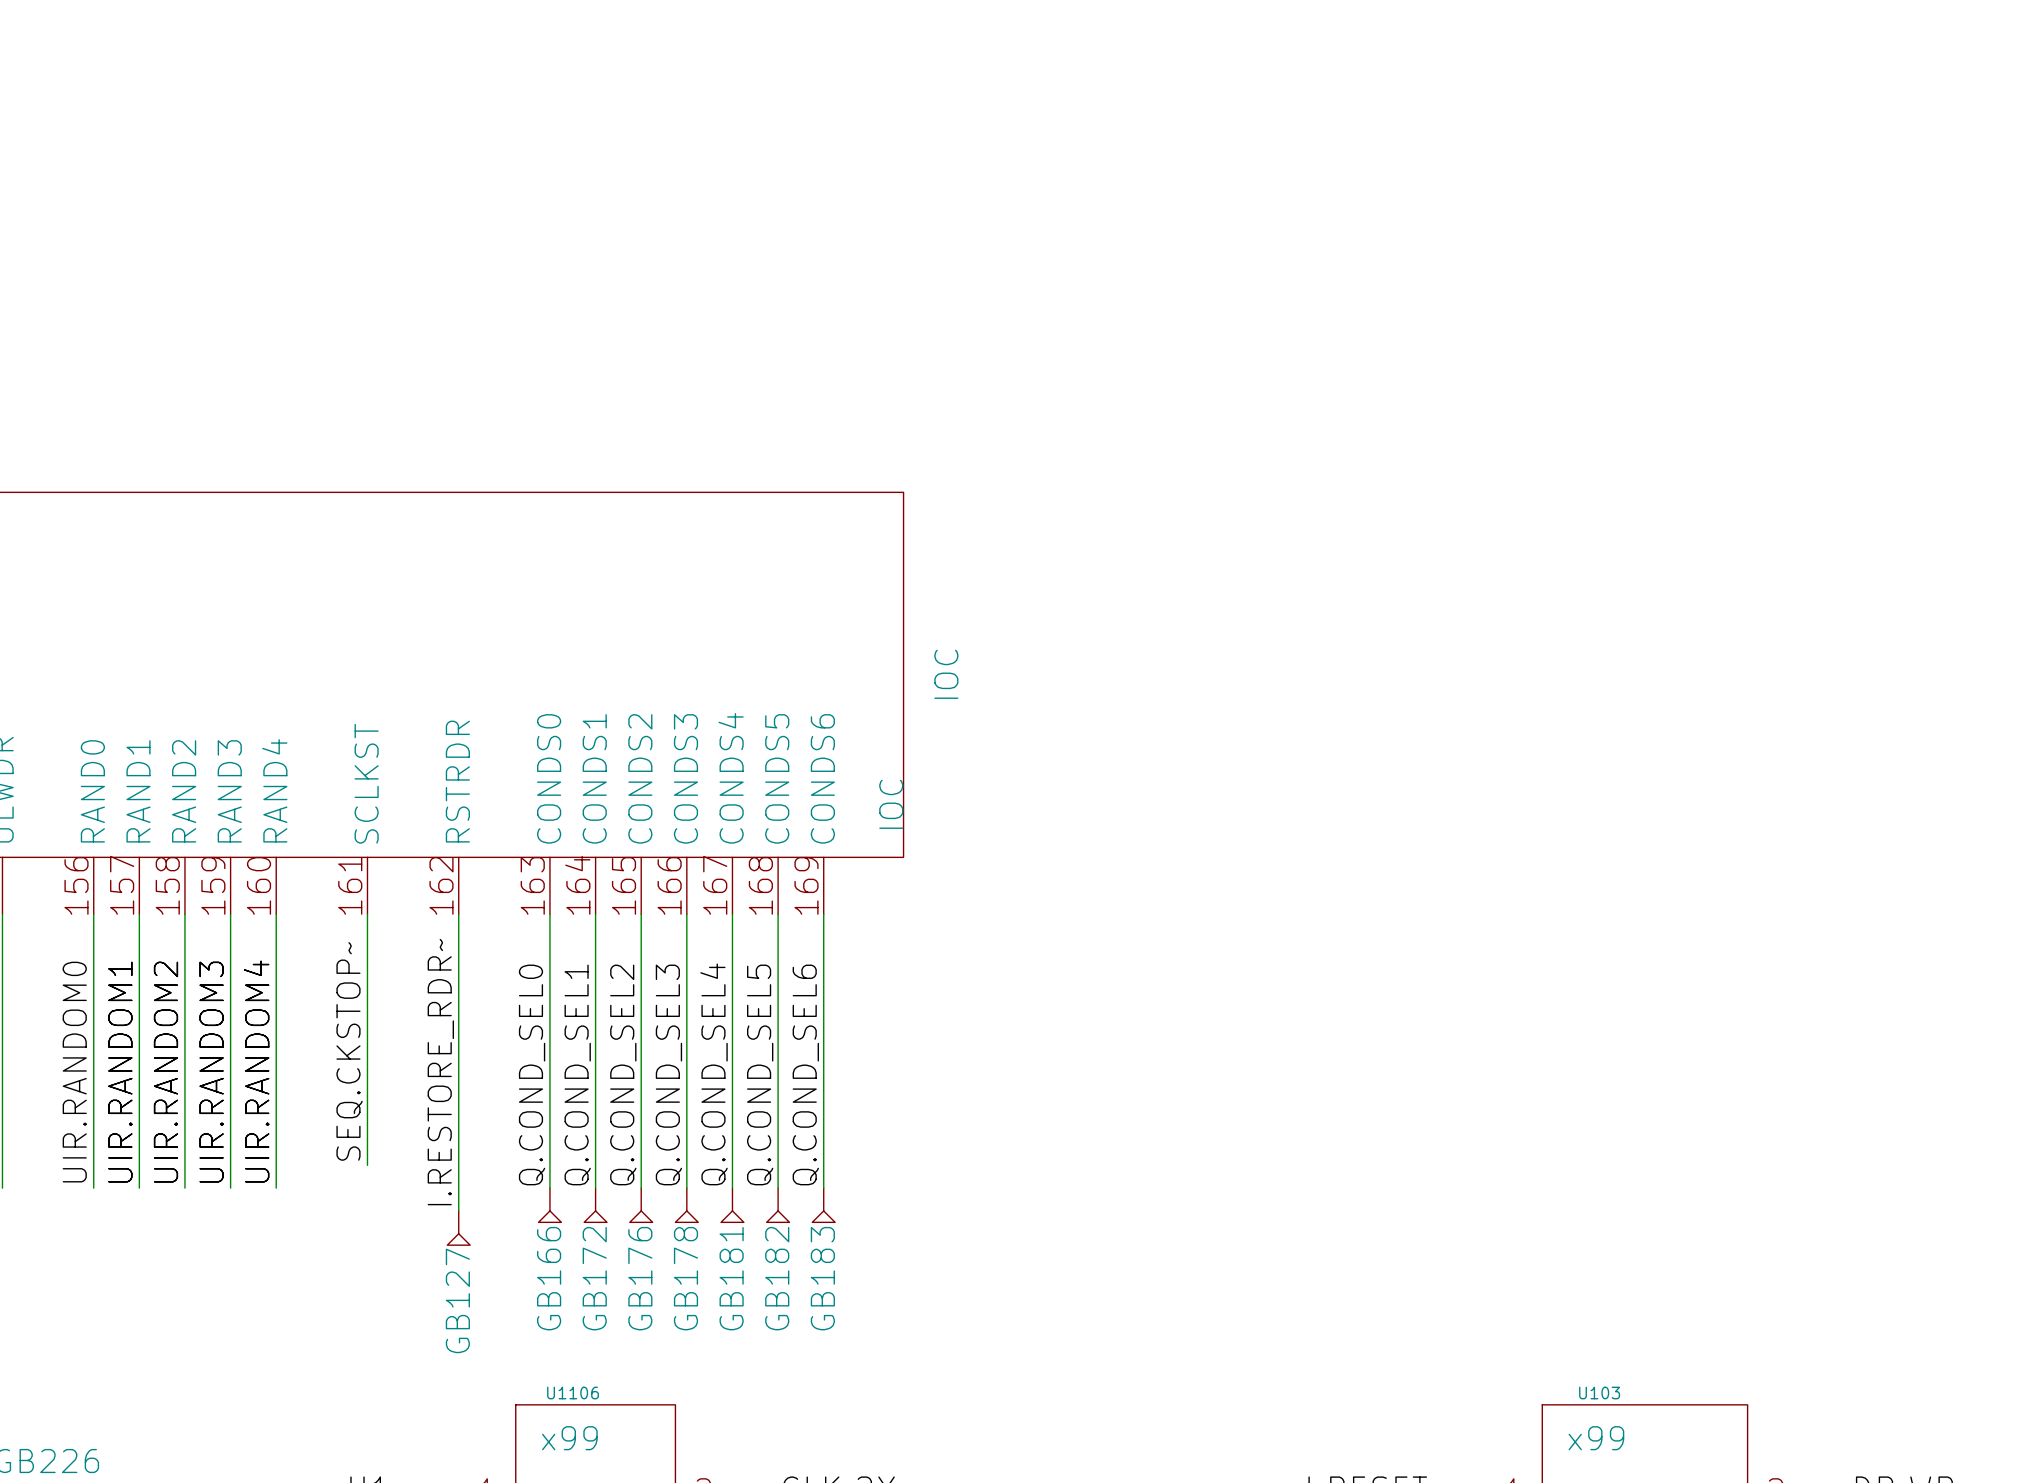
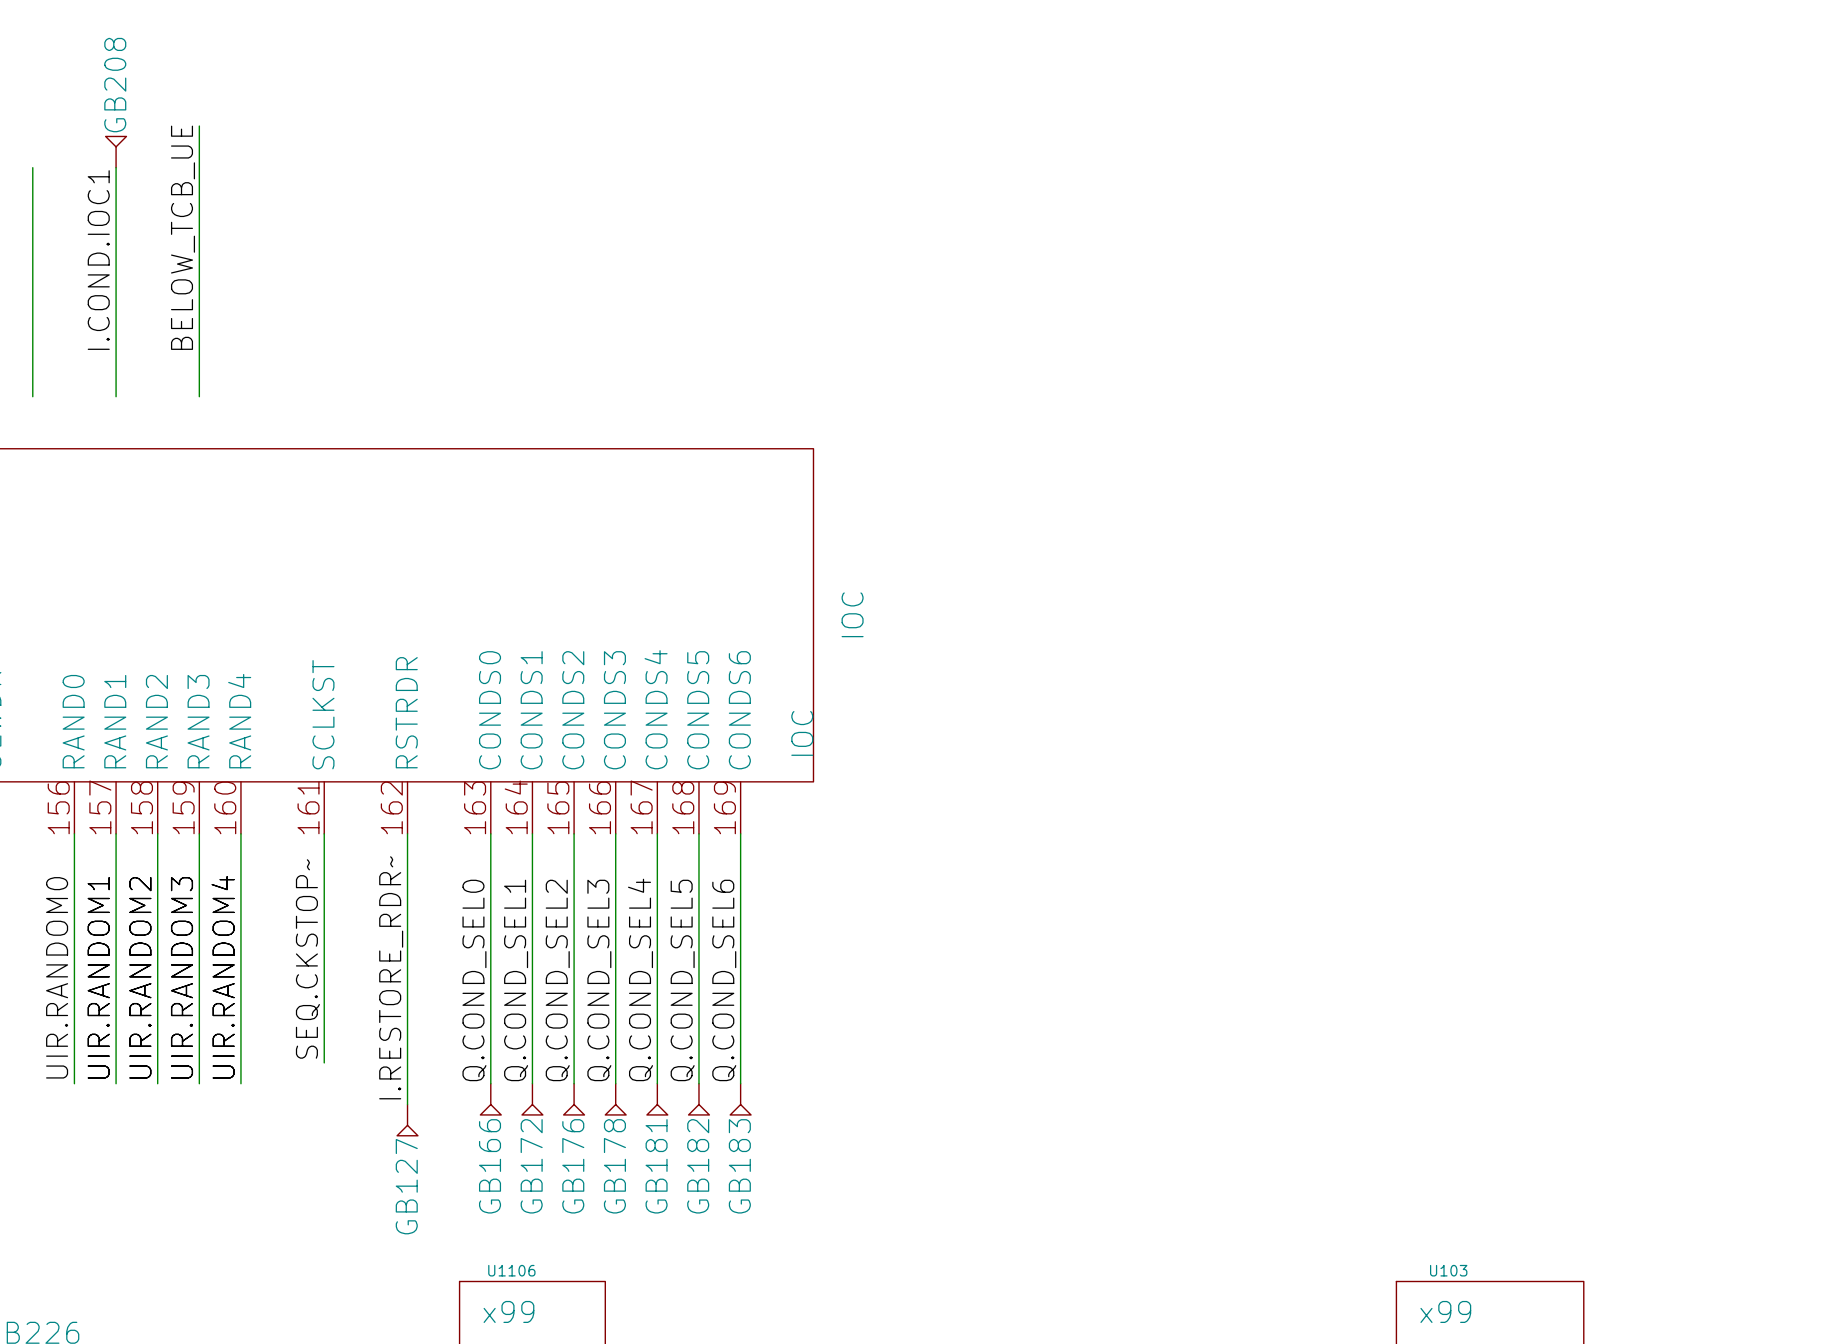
wire: none -> (199, 126) (199, 396)
GB208: none -> (116, 151)
wire: none -> (32, 167) (32, 396)
wire: none -> (116, 167) (116, 396)
label: none -> BELOW_TCB_UE (182, 237)
label: none -> I.COND.IOC1 (98, 260)

